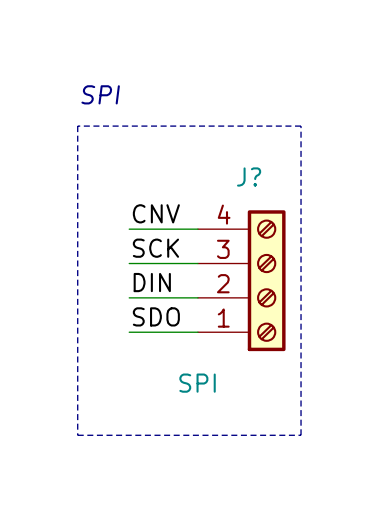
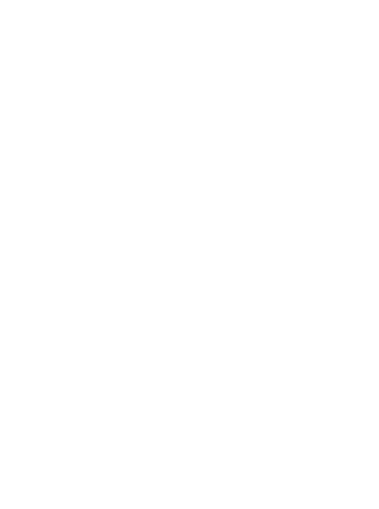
text: SPI (100, 94) -> none
line: (77, 126) (301, 126) (301, 435) (77, 435) (77, 126) -> none
label: CNV (156, 213) -> none
wire: (129, 229) (197, 229) -> none
label: SCK (155, 248) -> none
wire: (129, 263) (197, 263) -> none
J?: SPI (241, 280) -> none
label: DIN (152, 282) -> none
wire: (129, 297) (197, 297) -> none
label: SDO (156, 316) -> none
wire: (129, 332) (197, 332) -> none

